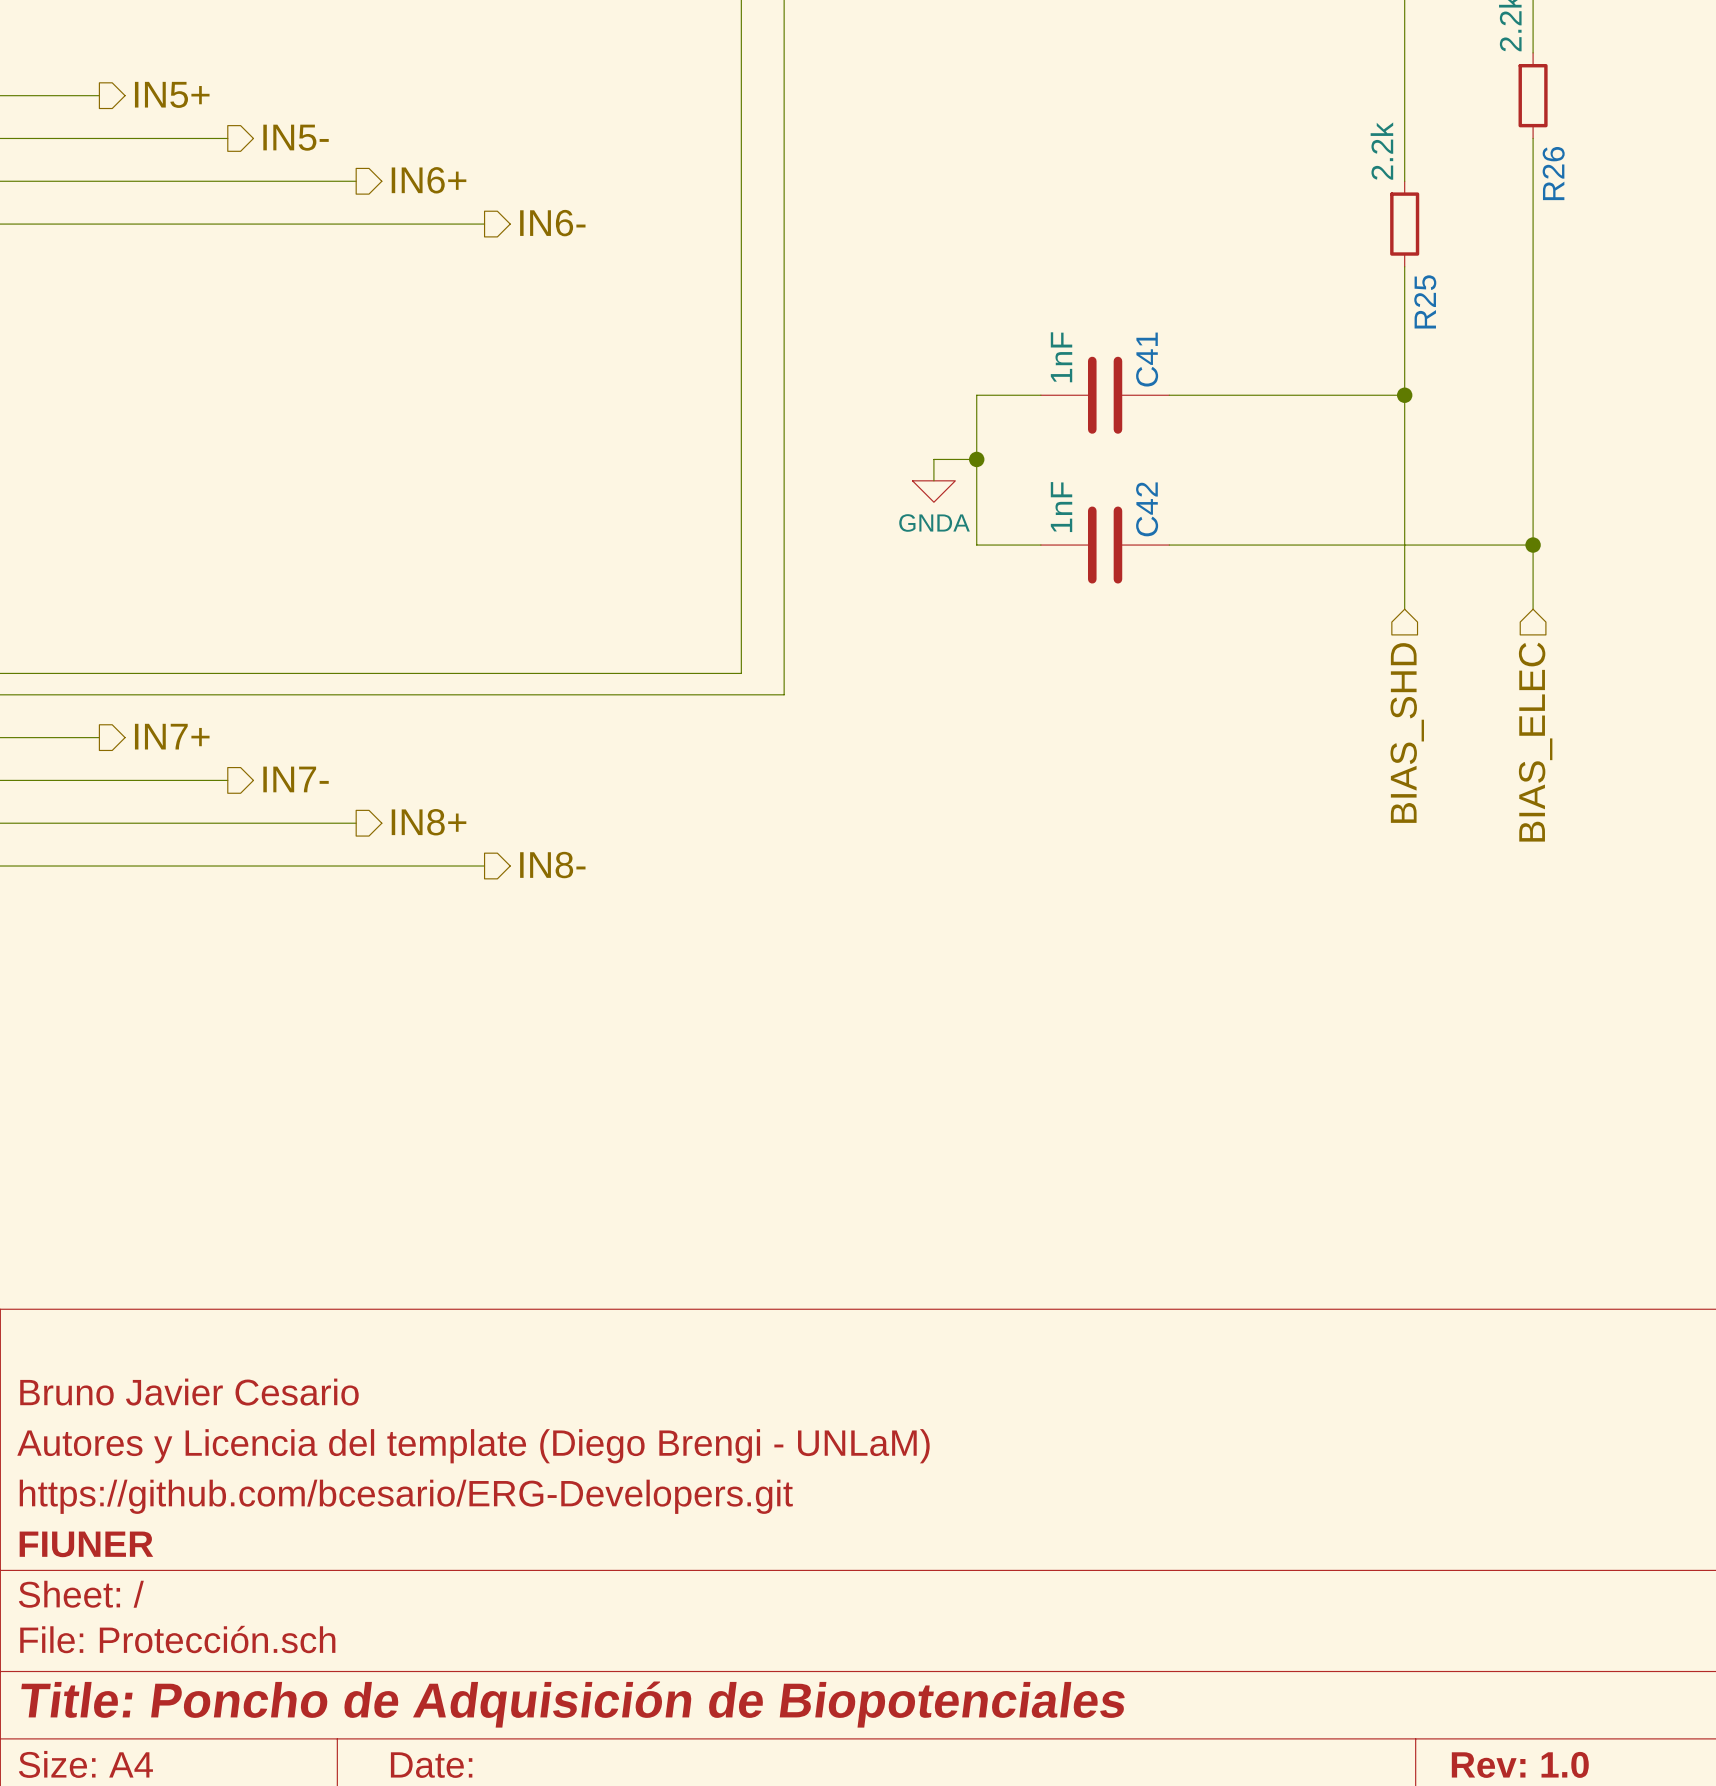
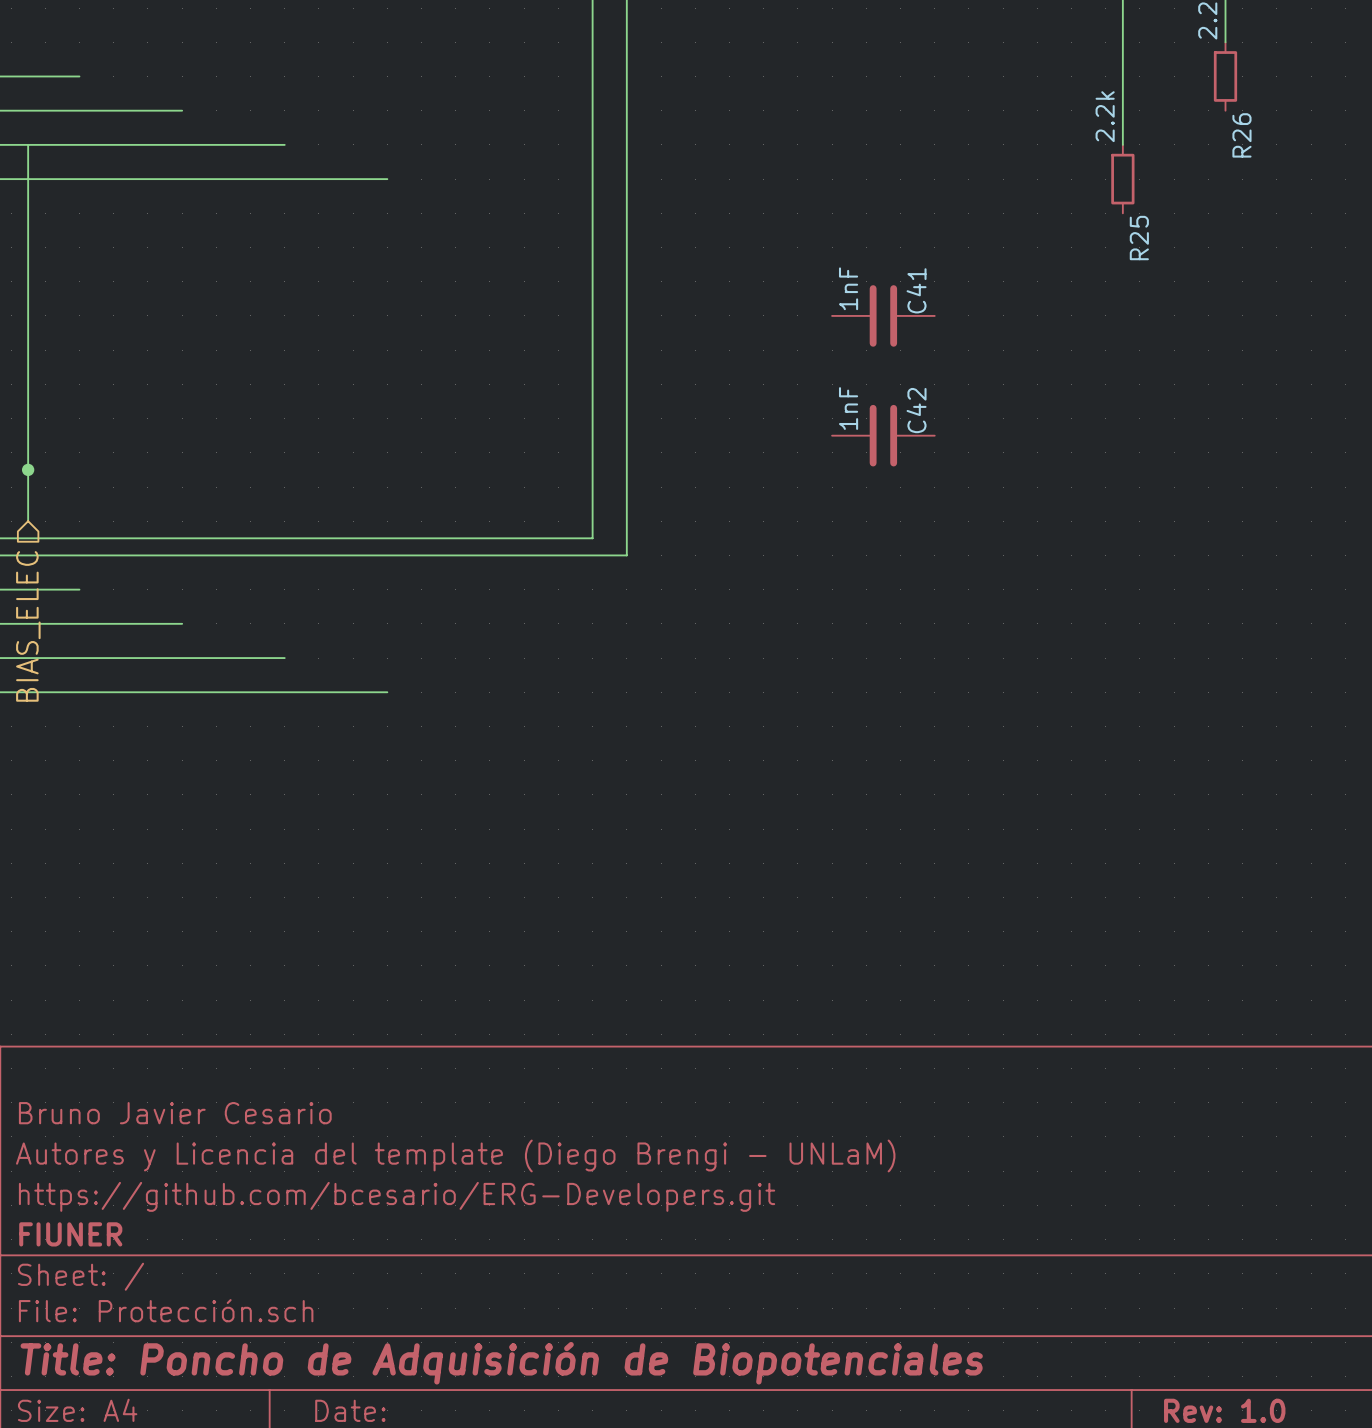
hierarchical label: IN5+ (172, 94) -> none
hierarchical label: IN5- (296, 137) -> none
wire: (1533, 138) (1533, 609) -> none
hierarchical label: IN6+ (429, 180) -> none
wire: none -> (28, 144) (28, 521)
hierarchical label: IN6- (552, 223) -> none
wire: (1404, 266) (1404, 609) -> none
wire: (1040, 395) (976, 395) (976, 545) (1040, 545) -> none
wire: (1169, 395) (1404, 395) -> none
junction: (1404, 395) -> none
wire: (976, 459) (933, 459) (933, 480) -> none
junction: (976, 459) -> none
power symbol: GNDA (933, 491) -> none
wire: (1169, 545) (1533, 545) -> none
junction: (1533, 545) -> none
junction: none -> (28, 469)
hierarchical label: BIAS_SHD (1407, 732) -> none
hierarchical label: IN7+ (172, 736) -> none
hierarchical label: BIAS_ELEC (1535, 742) -> none
hierarchical label: IN7- (296, 779) -> none
hierarchical label: none -> BIAS_ELEC (28, 626)
hierarchical label: IN8+ (429, 822) -> none
hierarchical label: IN8- (552, 865) -> none

